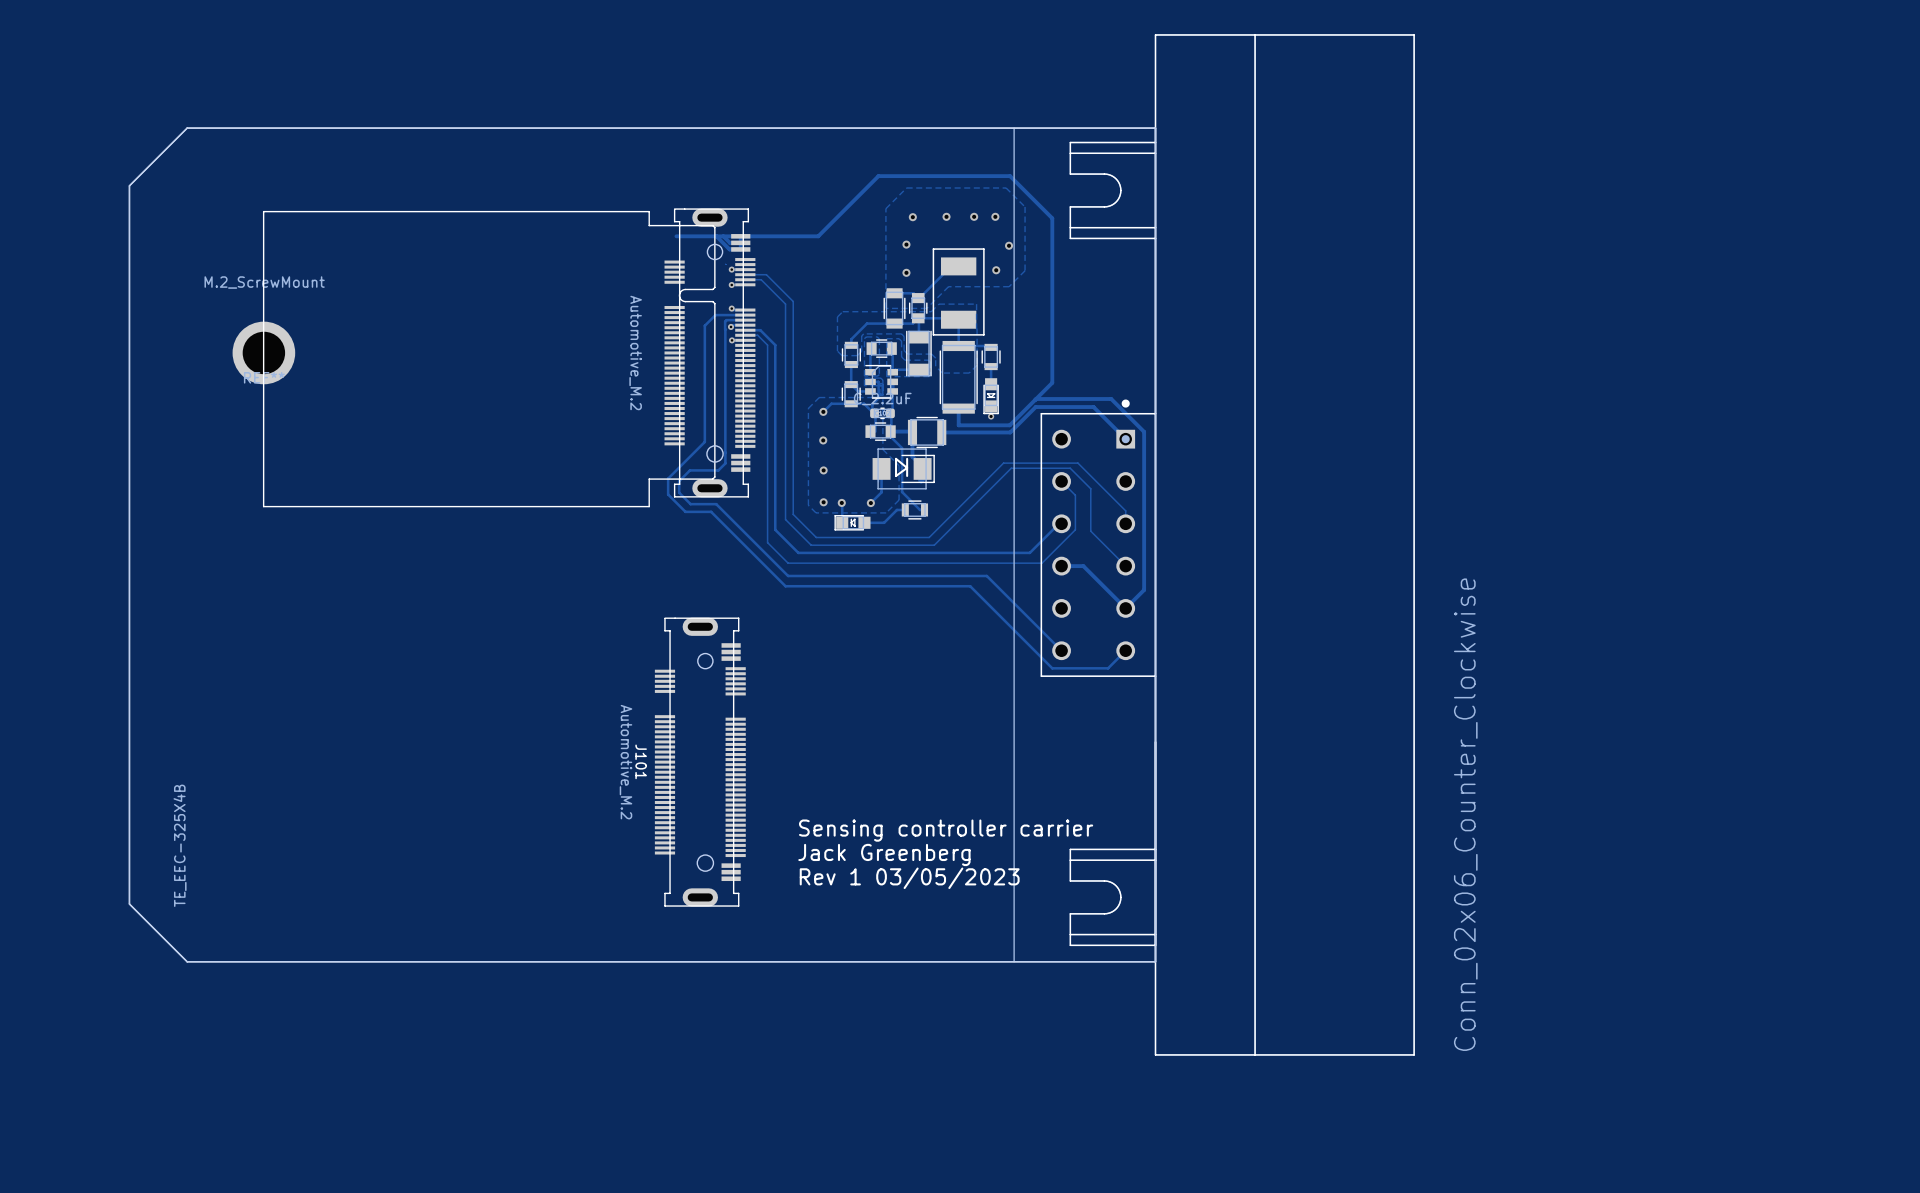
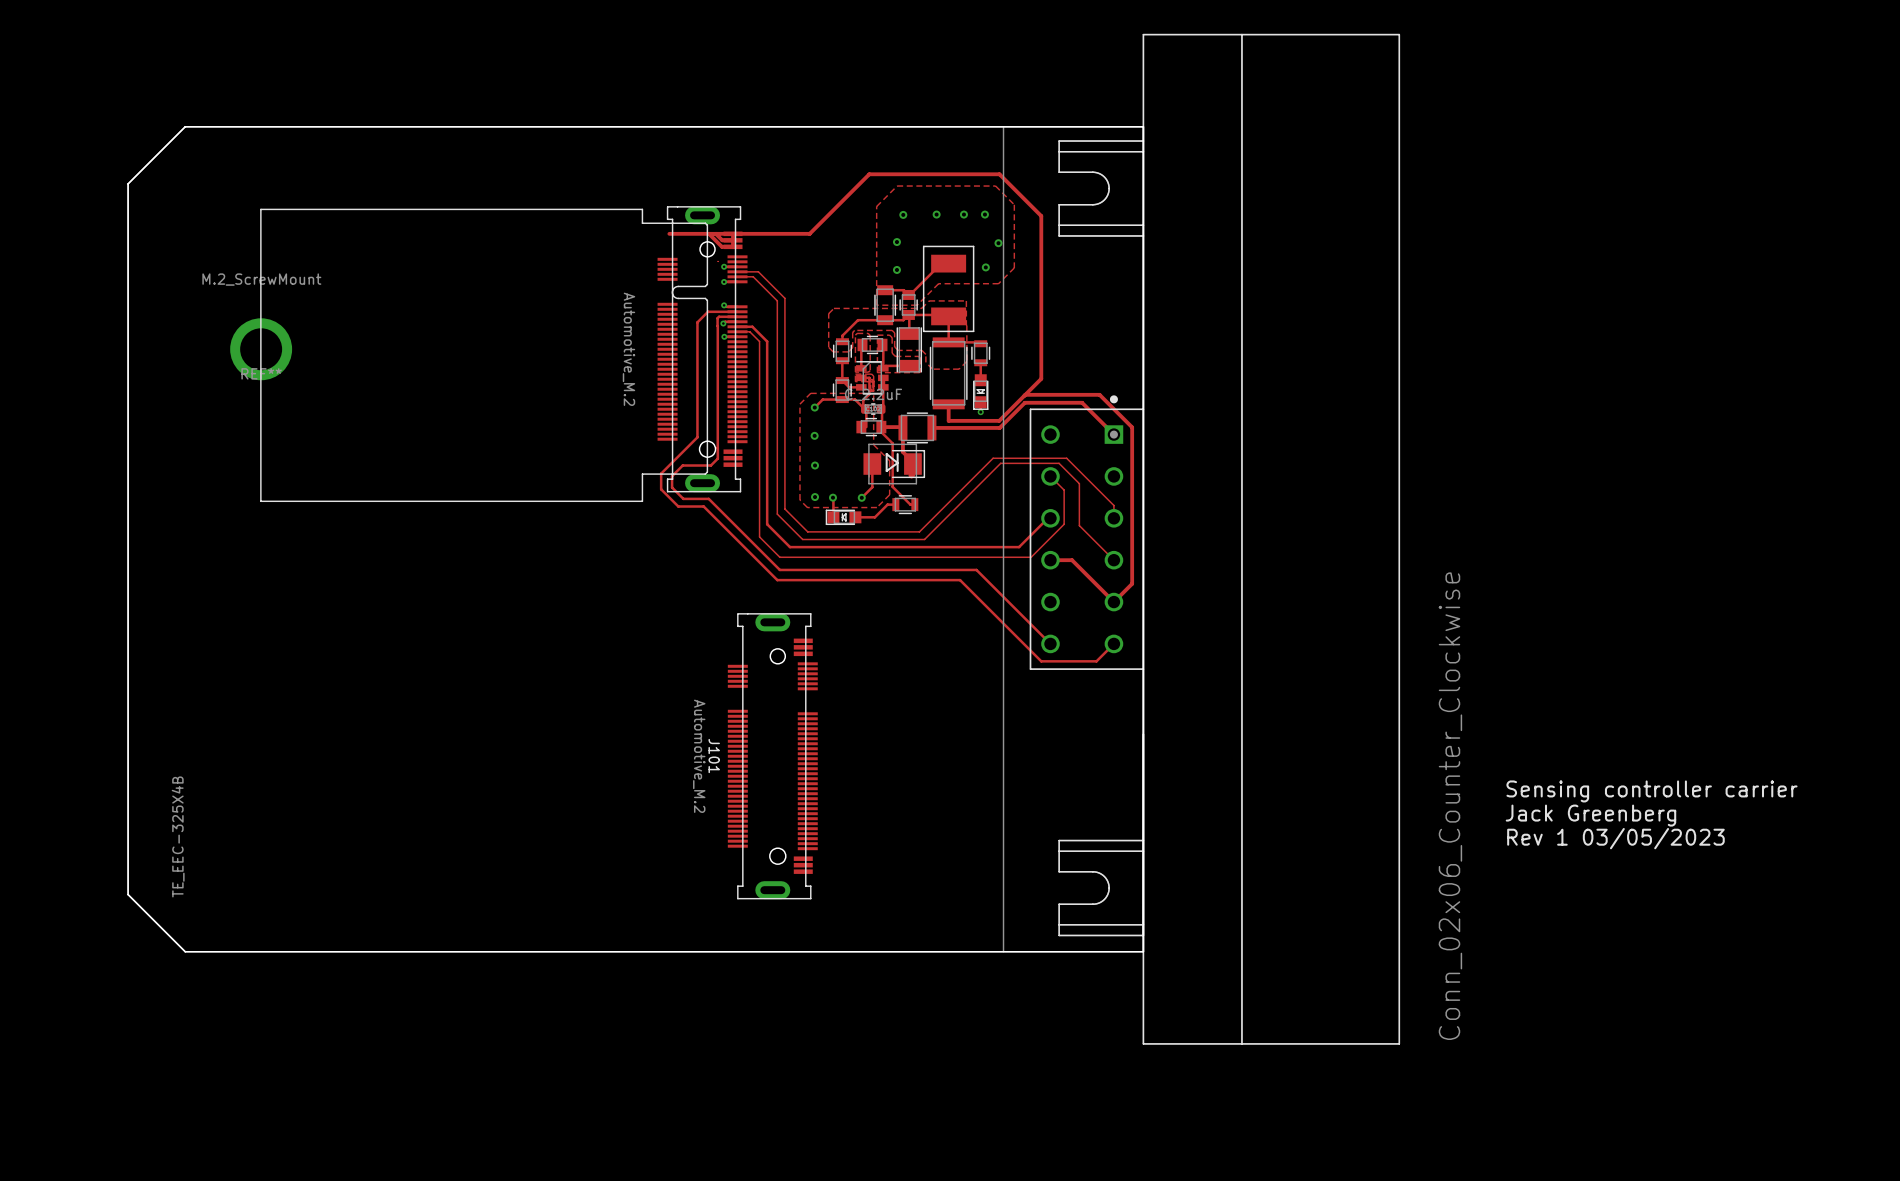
J101 position: (700, 762) -> (772, 756)
text: none -> Sensing controller carrier (1652, 791)
text: none -> Jack Greenberg (1590, 815)
text: Sensing controller carrier (946, 830) -> none
text: none -> Rev 1 03/05/2023 (1615, 838)
text: Jack Greenberg (884, 854) -> none
text: Rev 1 03/05/2023 (909, 878) -> none

